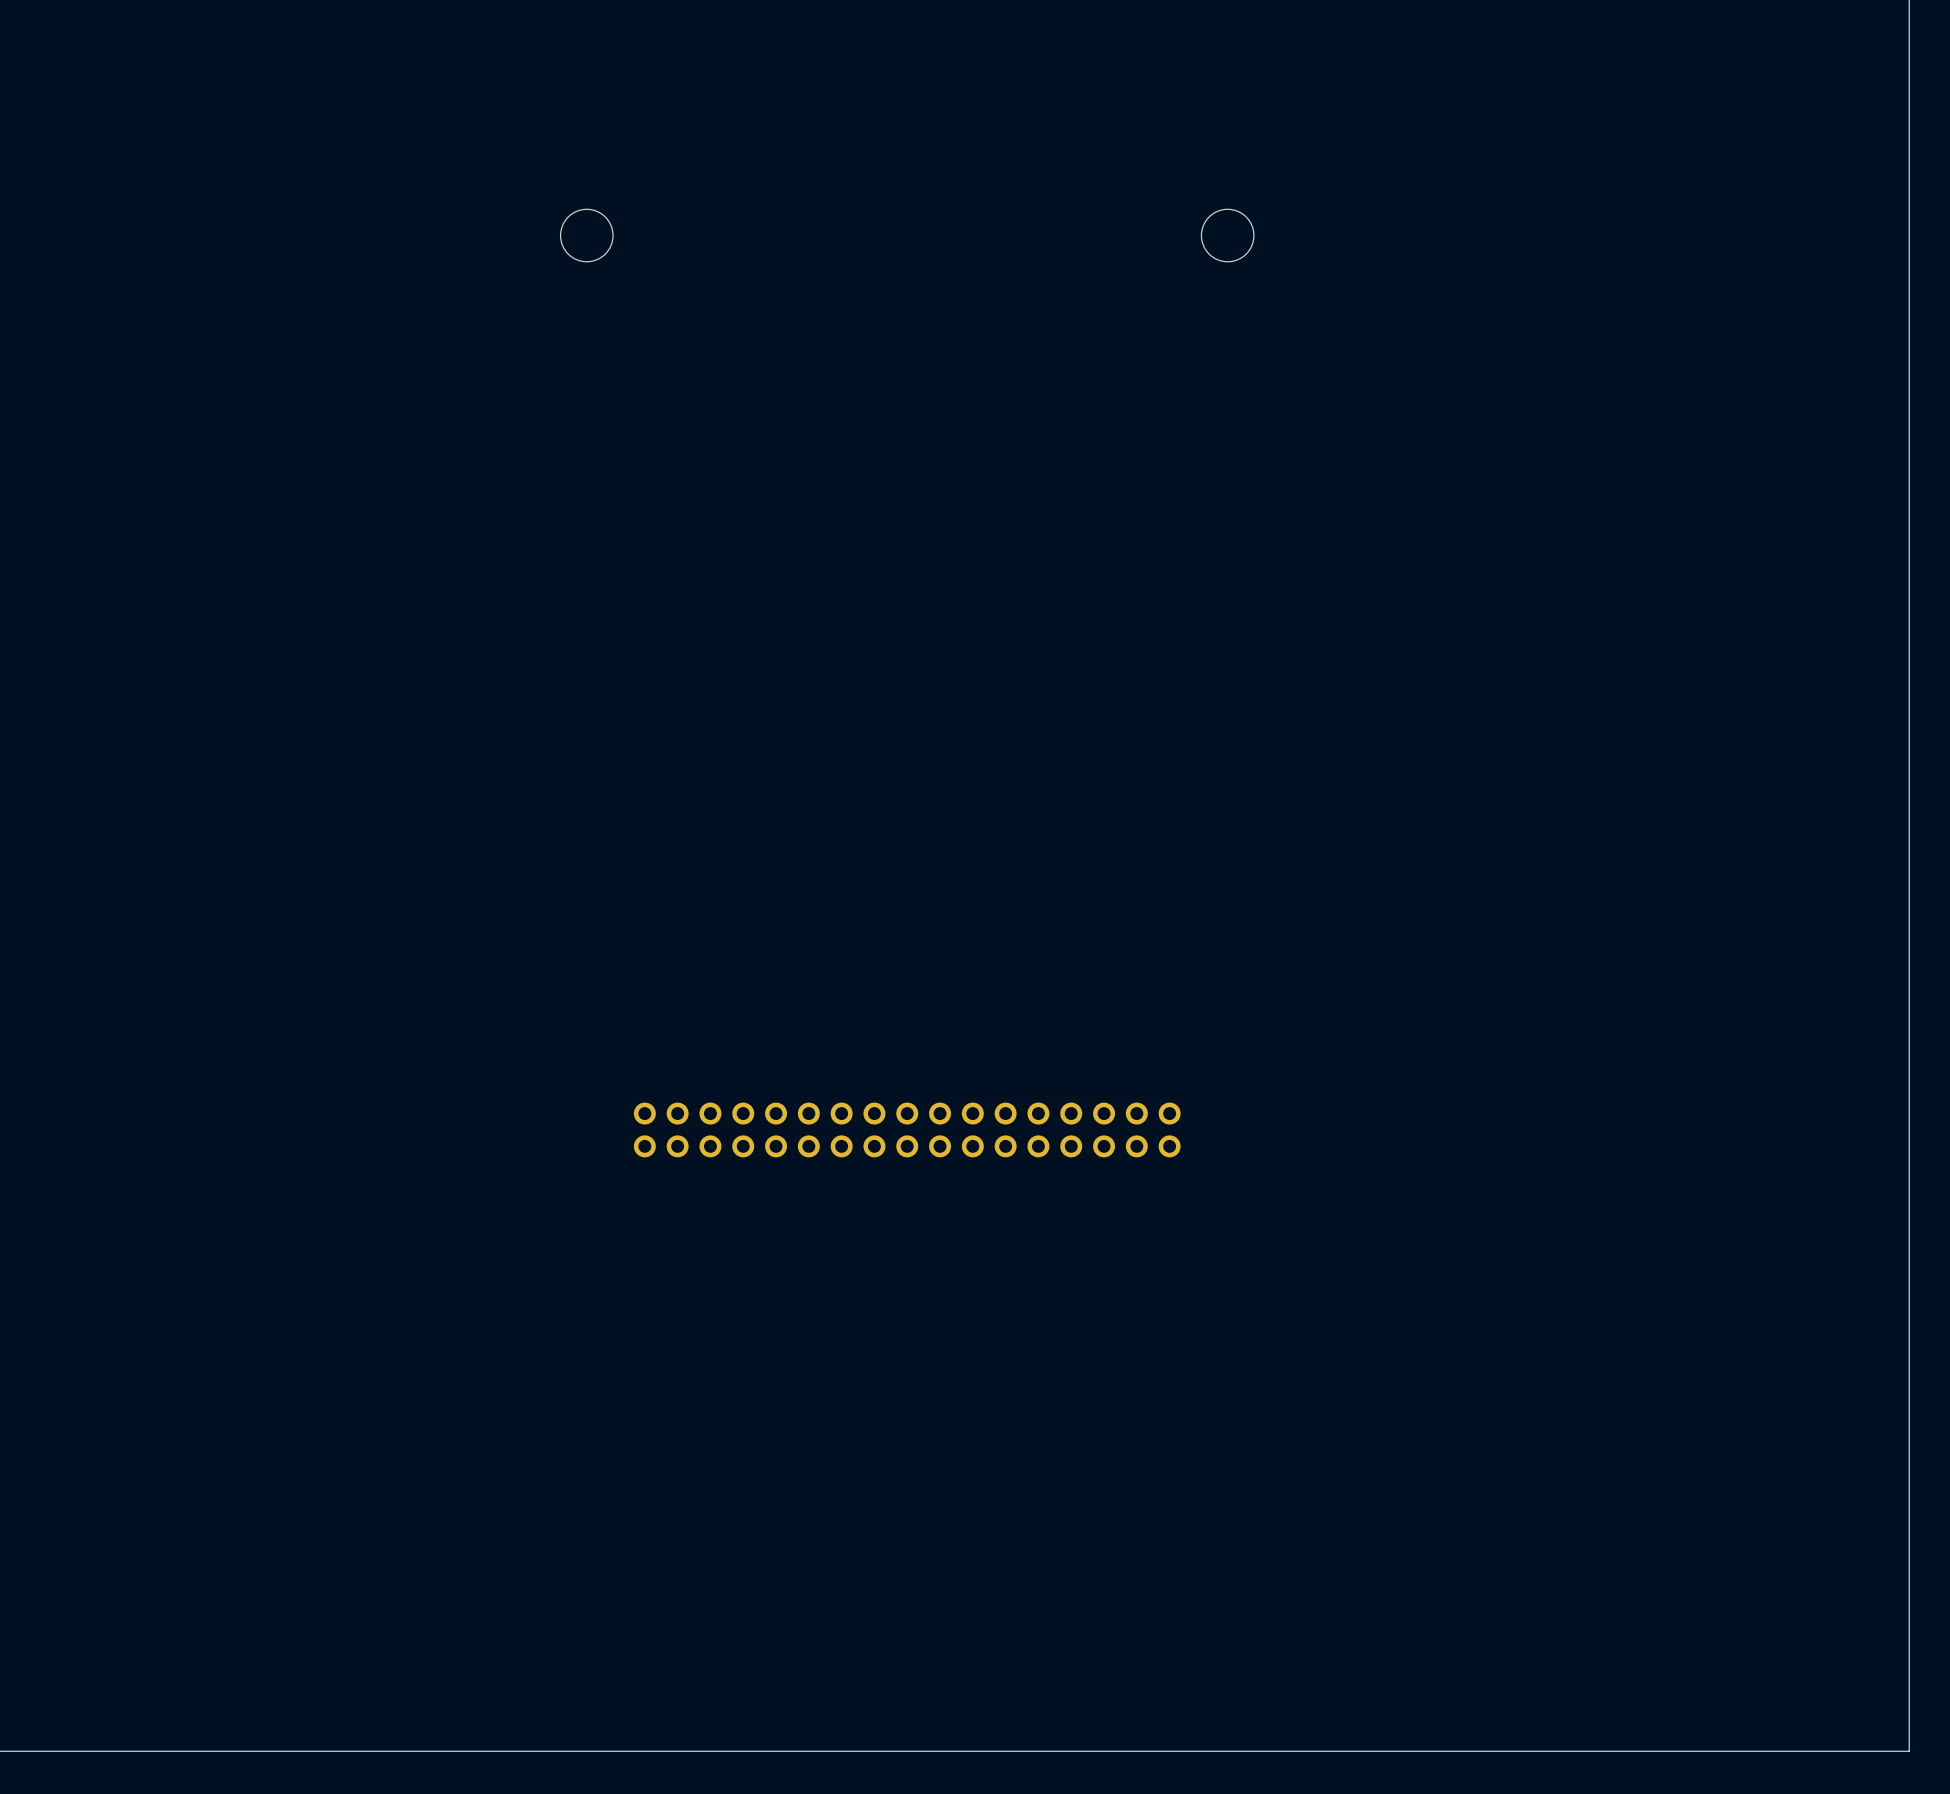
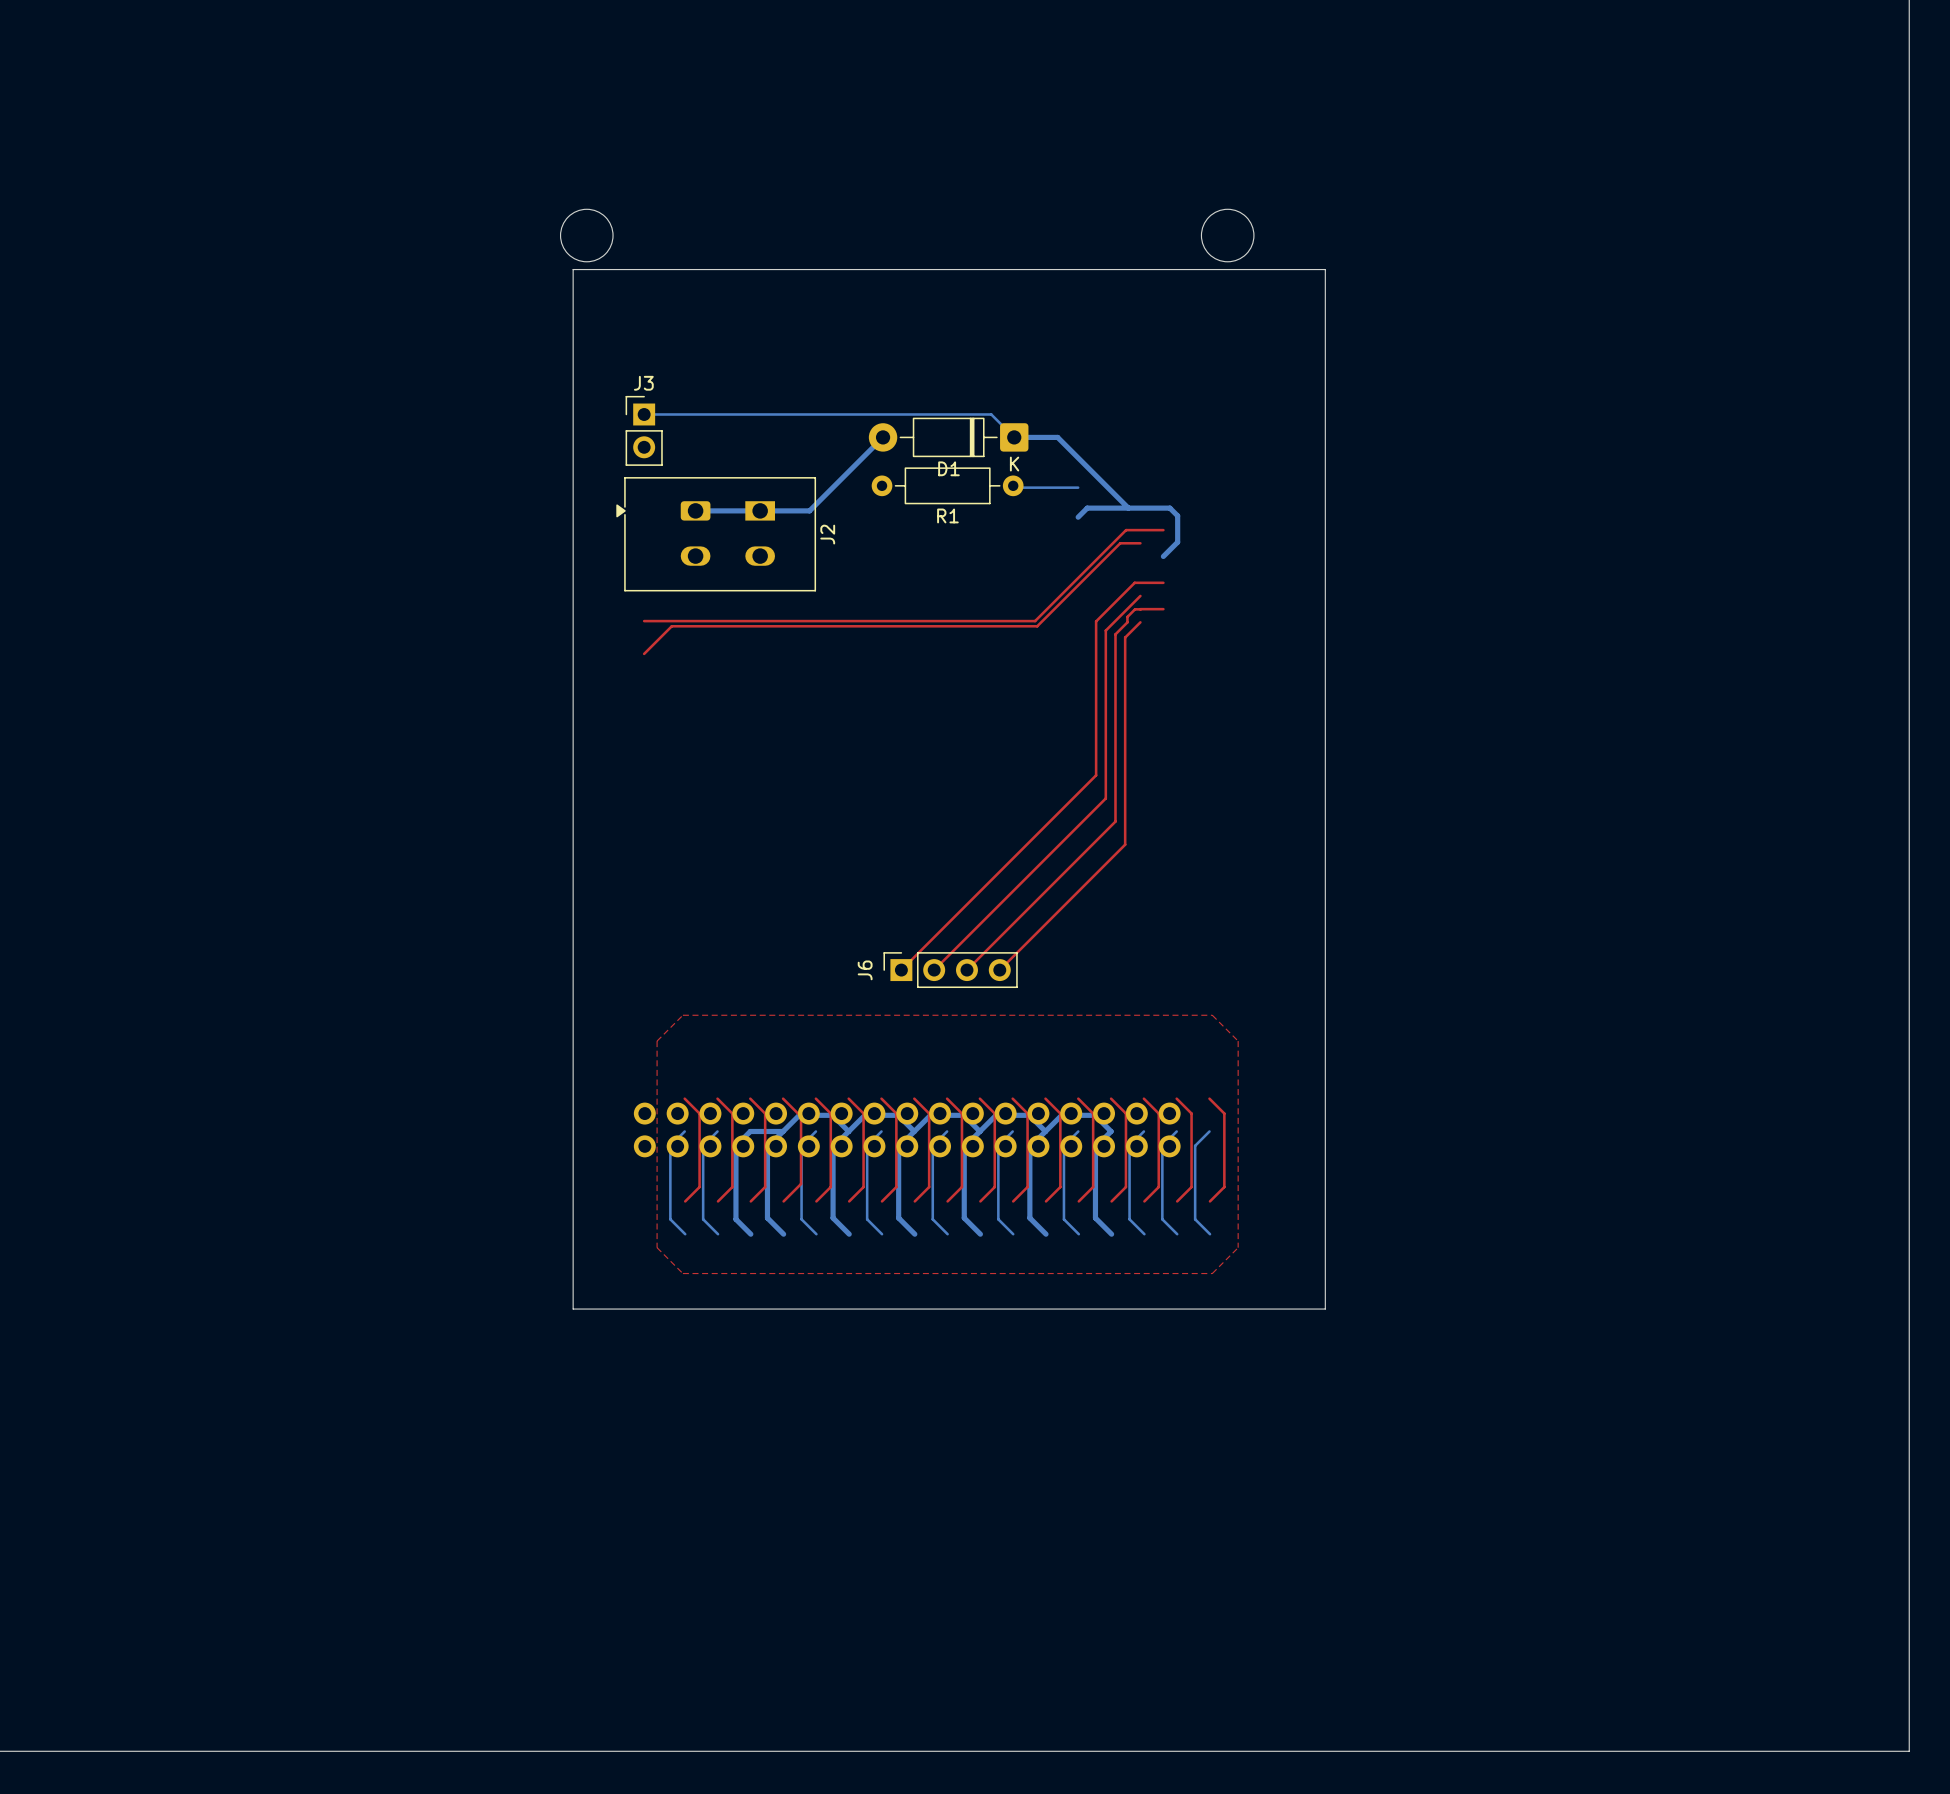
board edge: none -> (573, 269) (1325, 269) (1325, 1309) (573, 1309) (573, 269)
bottom track: none -> (644, 414) (991, 414) (1014, 437) (1057, 437) (1128, 508)
J3: none -> (644, 430)
bottom track: none -> (883, 437) (809, 510) (695, 510)
D1: none -> (948, 437)
R1: none -> (947, 485)
bottom track: none -> (1013, 485) (1015, 487) (1078, 487)
bottom track: none -> (1078, 517) (1087, 508) (1169, 508) (1177, 515) (1177, 542) (1163, 556)
top track: none -> (1163, 530) (1126, 530) (1035, 621) (644, 621)
J2: none -> (716, 534)
top track: none -> (1140, 543) (1120, 543) (1037, 626) (671, 626) (644, 653)
top track: none -> (1163, 582) (1134, 582) (1096, 621) (1096, 775) (901, 970)
top track: none -> (1140, 595) (1105, 630) (1105, 798) (934, 970)
top track: none -> (1163, 609) (1135, 609) (1127, 616) (1127, 622) (1115, 634) (1115, 821) (966, 970)
top track: none -> (1140, 622) (1125, 637) (1125, 844) (999, 970)
J6: none -> (950, 970)
top zone outline: none -> (682, 1015) (657, 1041) (657, 1247) (682, 1273) (1212, 1273) (1238, 1247) (1238, 1041) (1212, 1015) (682, 1015)
top track: none -> (684, 1098) (699, 1113) (699, 1187) (685, 1201)
top track: none -> (717, 1098) (732, 1113) (732, 1187) (718, 1201)
top track: none -> (750, 1098) (765, 1113) (765, 1187) (750, 1201)
top track: none -> (783, 1098) (801, 1116) (801, 1183) (783, 1201)
top track: none -> (815, 1098) (830, 1113) (830, 1187) (816, 1201)
top track: none -> (848, 1098) (863, 1113) (863, 1187) (849, 1201)
top track: none -> (881, 1098) (896, 1113) (896, 1187) (882, 1201)
top track: none -> (914, 1098) (929, 1113) (929, 1187) (914, 1201)
top track: none -> (947, 1098) (961, 1113) (961, 1187) (947, 1201)
top track: none -> (979, 1098) (994, 1113) (994, 1187) (980, 1201)
top track: none -> (1012, 1098) (1027, 1113) (1027, 1187) (1013, 1201)
top track: none -> (1045, 1098) (1060, 1113) (1060, 1187) (1046, 1201)
top track: none -> (1078, 1098) (1093, 1113) (1093, 1187) (1078, 1201)
top track: none -> (1111, 1098) (1125, 1113) (1125, 1187) (1111, 1201)
top track: none -> (1143, 1098) (1158, 1113) (1158, 1187) (1144, 1201)
top track: none -> (1176, 1098) (1191, 1113) (1191, 1187) (1177, 1201)
top track: none -> (1209, 1098) (1224, 1113) (1224, 1187) (1210, 1201)
bottom track: none -> (684, 1131) (670, 1145) (670, 1219) (685, 1234)
bottom track: none -> (717, 1131) (703, 1145) (703, 1219) (718, 1234)
bottom track: none -> (783, 1131) (750, 1131) (735, 1145) (735, 1219) (750, 1234)
bottom track: none -> (815, 1131) (801, 1145) (801, 1219) (816, 1234)
bottom track: none -> (848, 1131) (832, 1115) (799, 1115) (767, 1147) (767, 1218) (783, 1234)
bottom track: none -> (881, 1131) (867, 1145) (867, 1219) (882, 1234)
bottom track: none -> (914, 1131) (898, 1115) (864, 1115) (833, 1147) (833, 1218) (849, 1234)
bottom track: none -> (947, 1131) (932, 1145) (932, 1219) (947, 1234)
bottom track: none -> (979, 1131) (963, 1115) (930, 1115) (898, 1147) (898, 1218) (914, 1234)
bottom track: none -> (1012, 1131) (998, 1145) (998, 1219) (1013, 1234)
bottom track: none -> (1045, 1131) (1029, 1115) (996, 1115) (964, 1147) (964, 1218) (980, 1234)
bottom track: none -> (1078, 1131) (1063, 1145) (1063, 1219) (1078, 1234)
bottom track: none -> (1143, 1131) (1129, 1145) (1129, 1219) (1144, 1234)
bottom track: none -> (1176, 1131) (1162, 1145) (1162, 1219) (1177, 1234)
bottom track: none -> (1209, 1131) (1195, 1145) (1195, 1219) (1210, 1234)
bottom track: none -> (1046, 1234) (1029, 1218) (1029, 1147) (1061, 1115) (1094, 1115) (1111, 1131) (1095, 1147) (1095, 1218) (1111, 1234)

